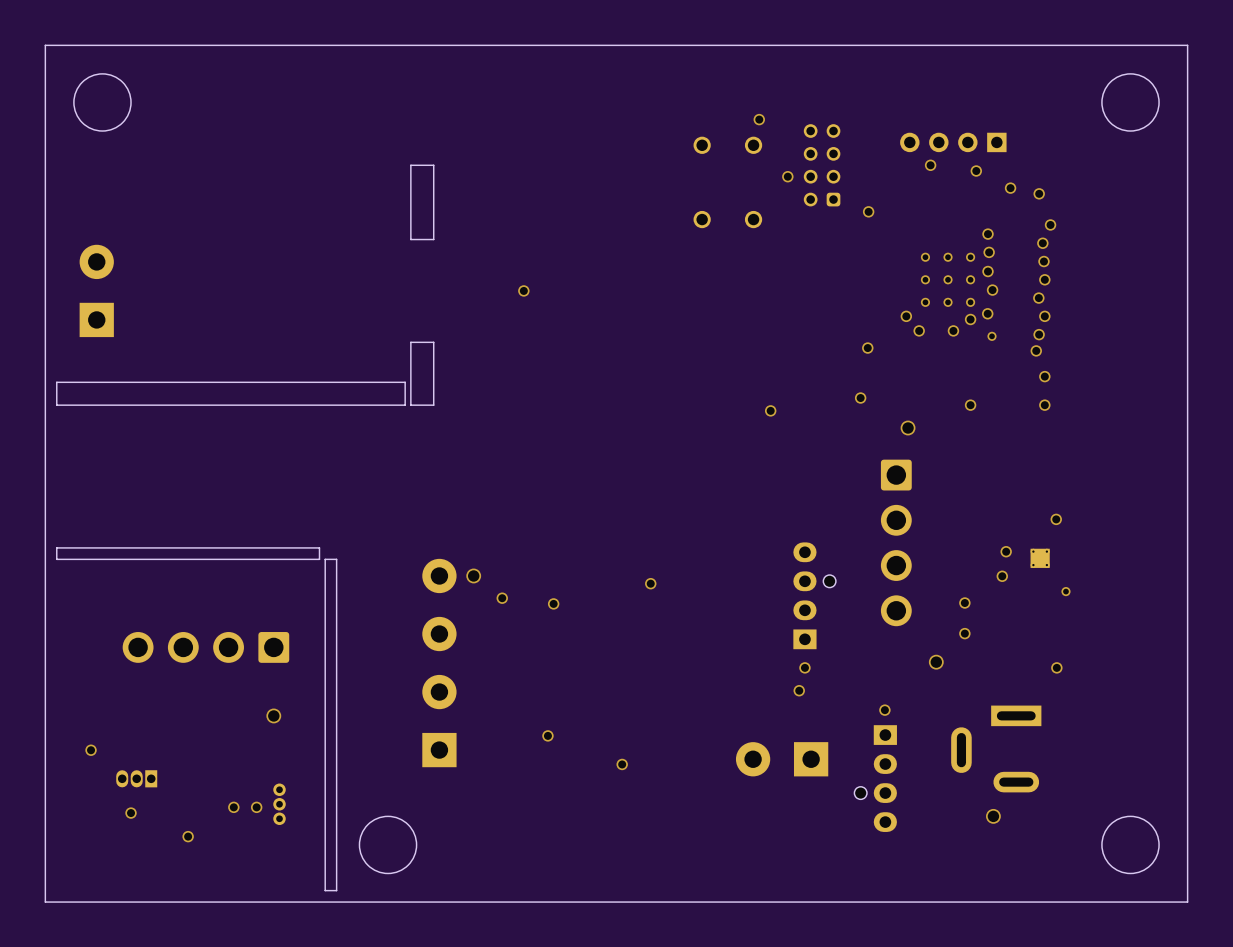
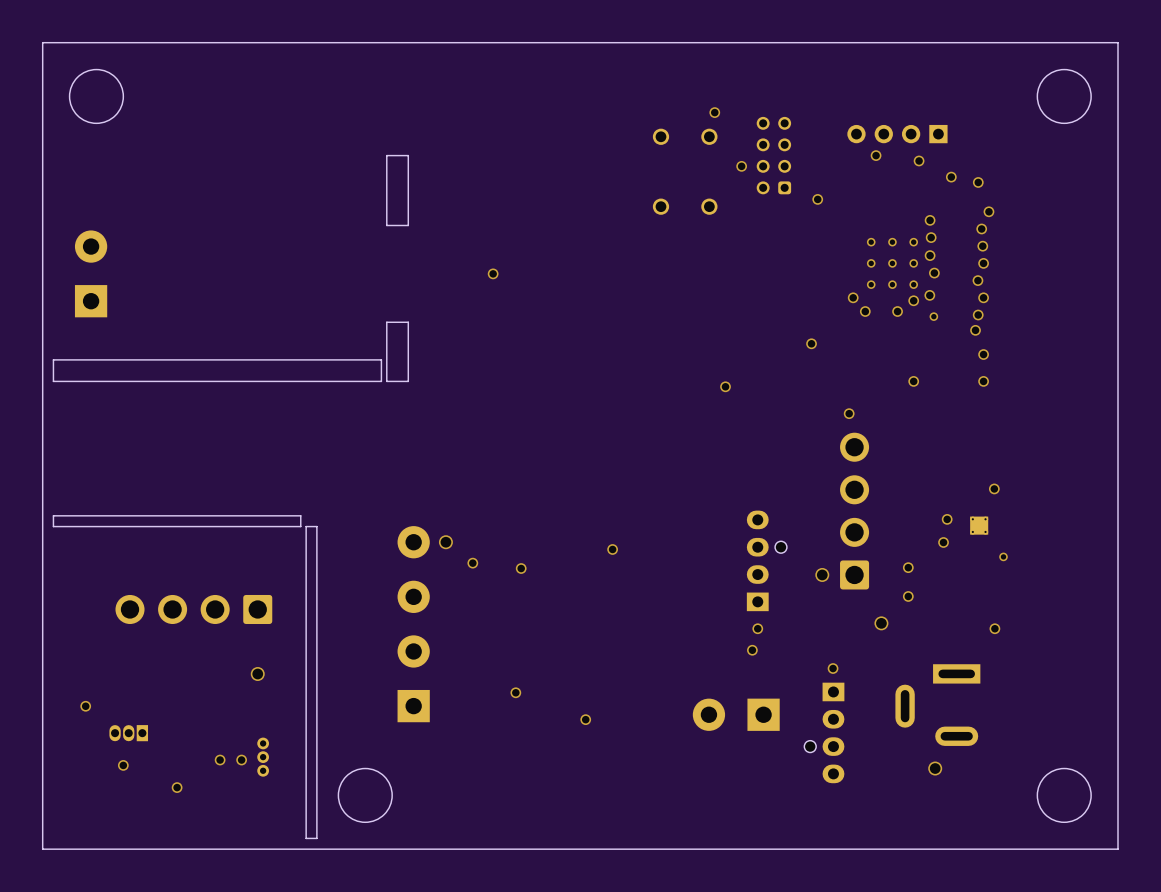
via: (867, 348) -> none
via: none -> (811, 343)
via: (860, 398) -> none
via: (908, 428) -> none
via: none -> (849, 413)
part rotation: 0° (896, 542) -> 180° (854, 511)
via: none -> (822, 574)

